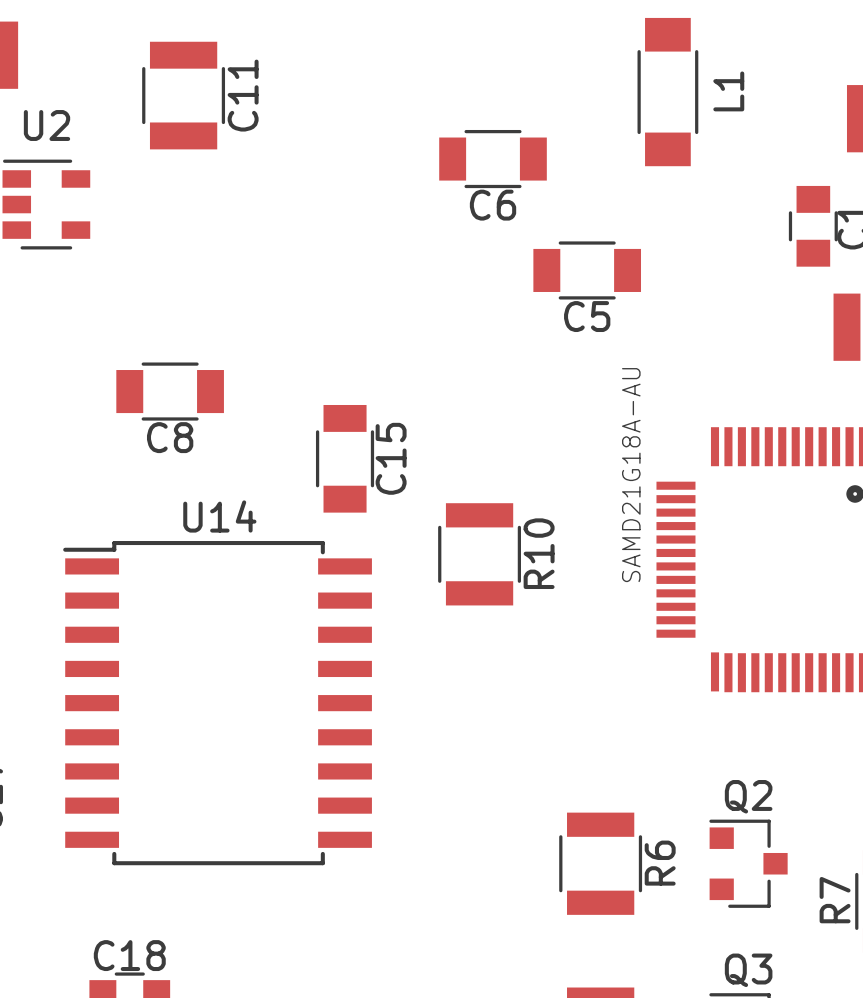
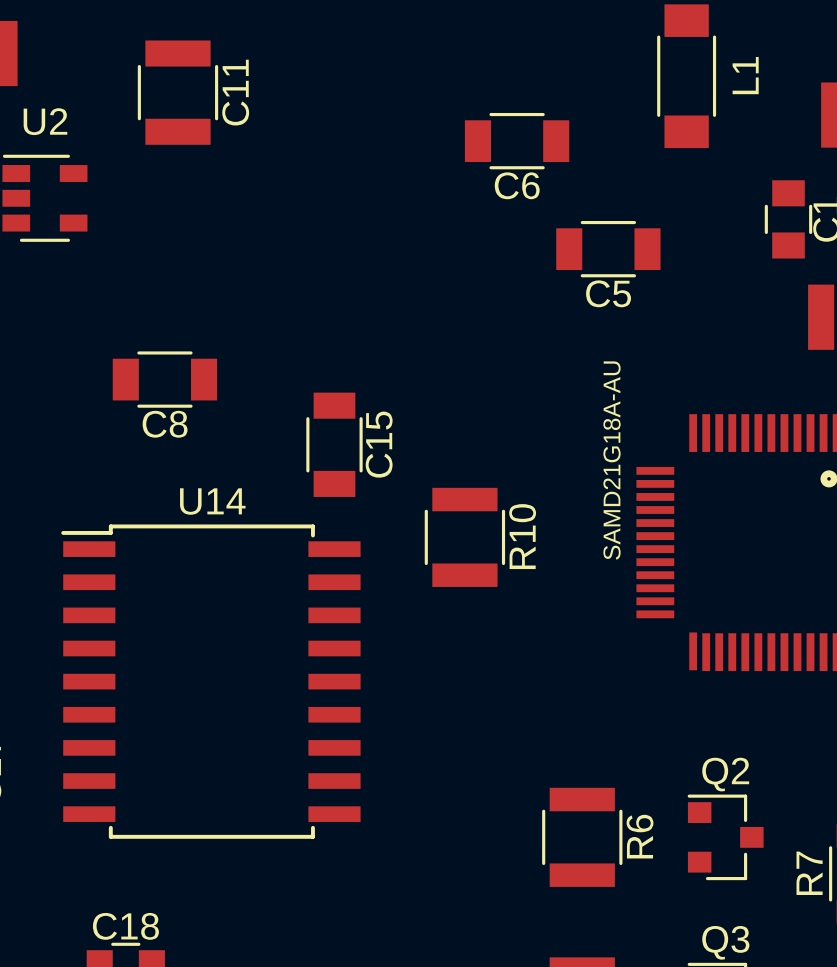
L1 position: (667, 92) -> (686, 76)
C6 position: (493, 159) -> (517, 141)
C5 position: (587, 270) -> (608, 249)

